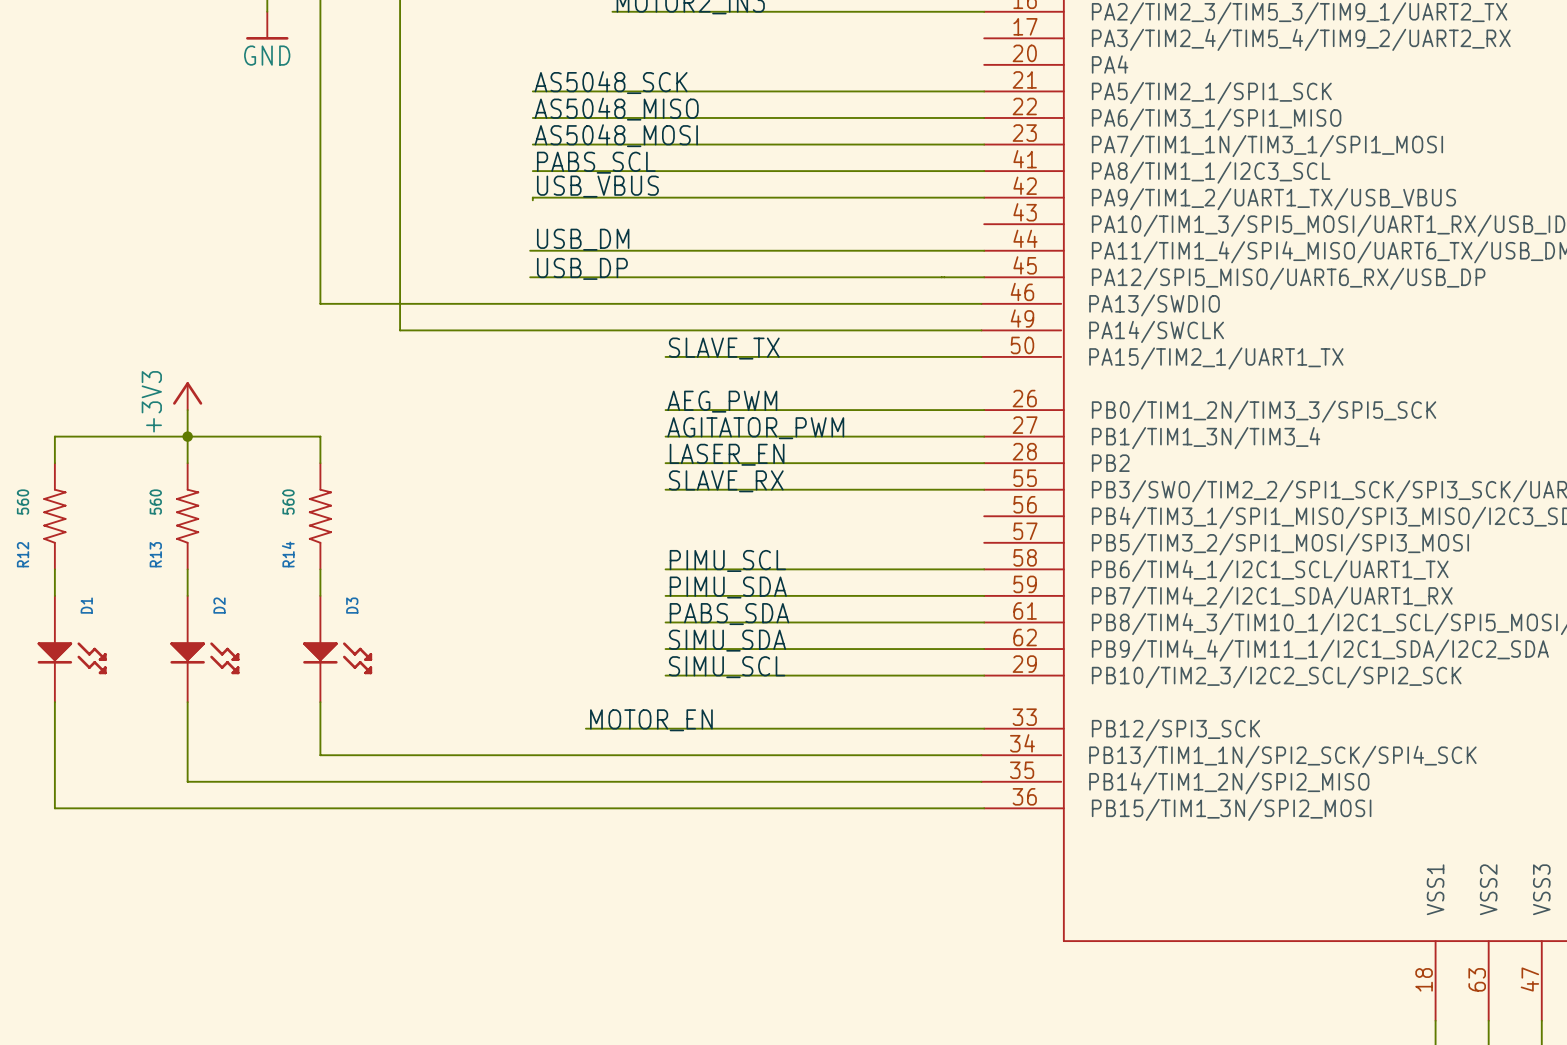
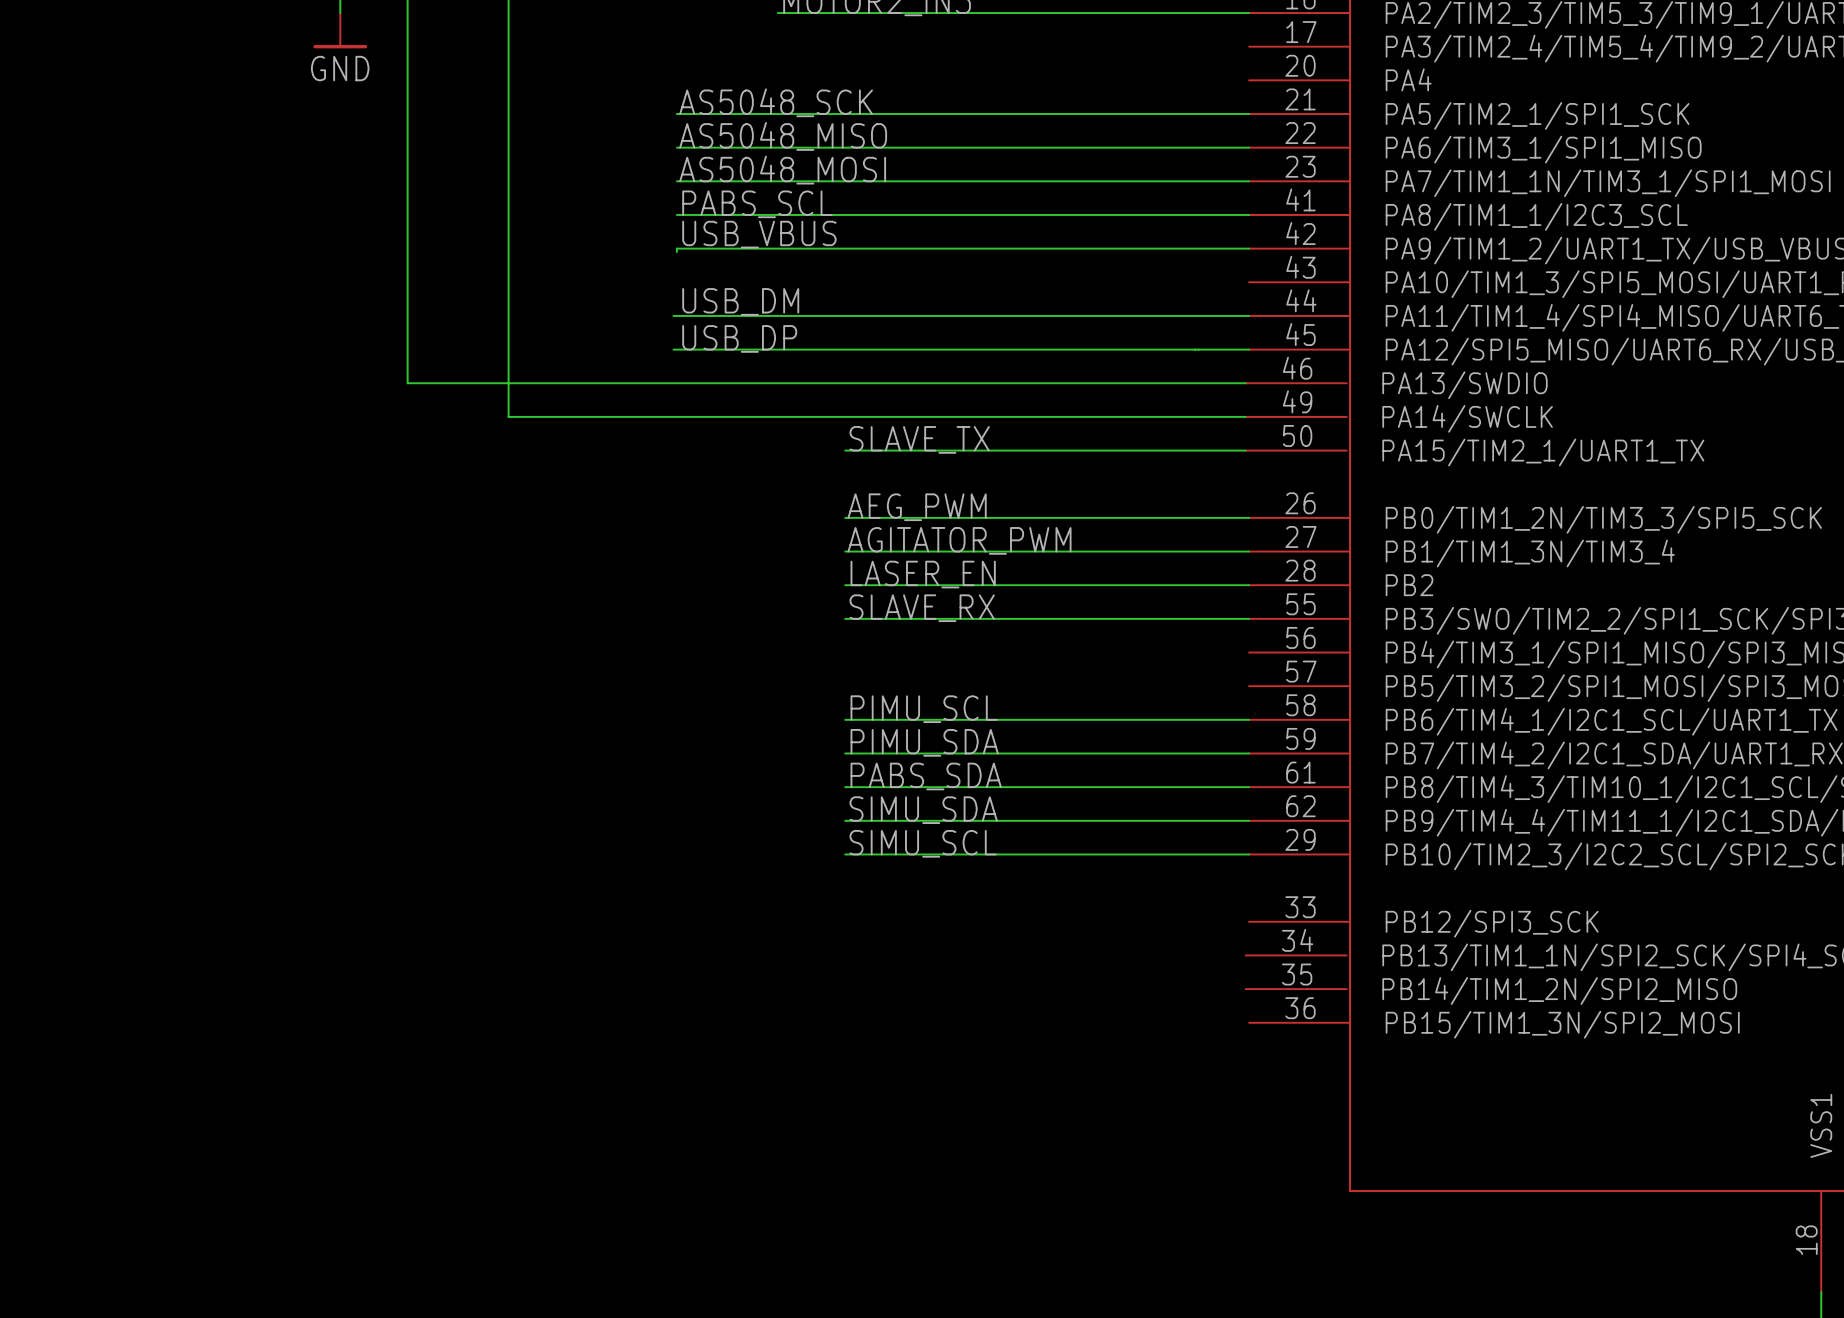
power symbol: +3V3 (187, 396) -> none
wire: (187, 410) (187, 463) -> none
junction: (187, 436) -> none
wire: (54, 463) (54, 436) (320, 436) (320, 463) -> none
R12: 560 (54, 516) -> none
R13: 560 (187, 516) -> none
R14: 560 (320, 516) -> none
wire: (54, 569) (54, 595) -> none
wire: (187, 569) (187, 595) -> none
wire: (320, 569) (320, 595) -> none
D1: (72, 649) -> none
D2: (204, 649) -> none
D3: (337, 649) -> none
wire: (54, 702) (54, 808) (984, 808) -> none
wire: (187, 702) (187, 781) (981, 781) -> none
wire: (320, 702) (320, 755) (981, 755) -> none
label: MOTOR_EN (651, 720) -> none
wire: (585, 728) (984, 728) -> none

